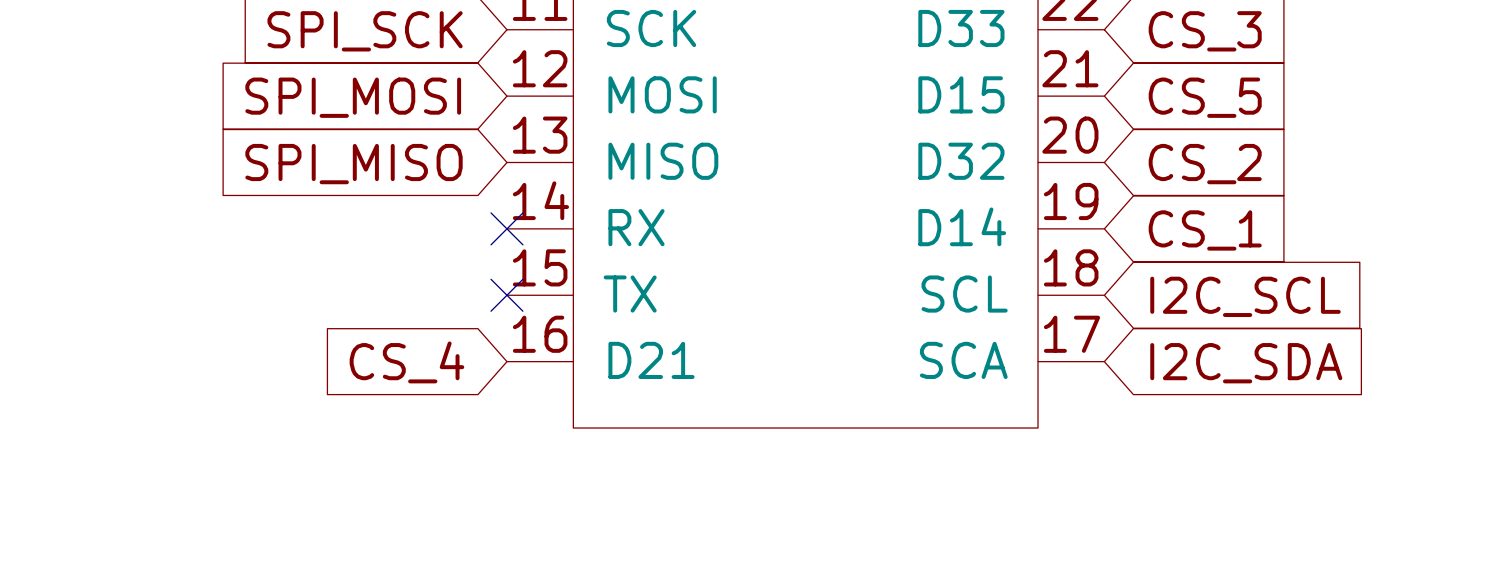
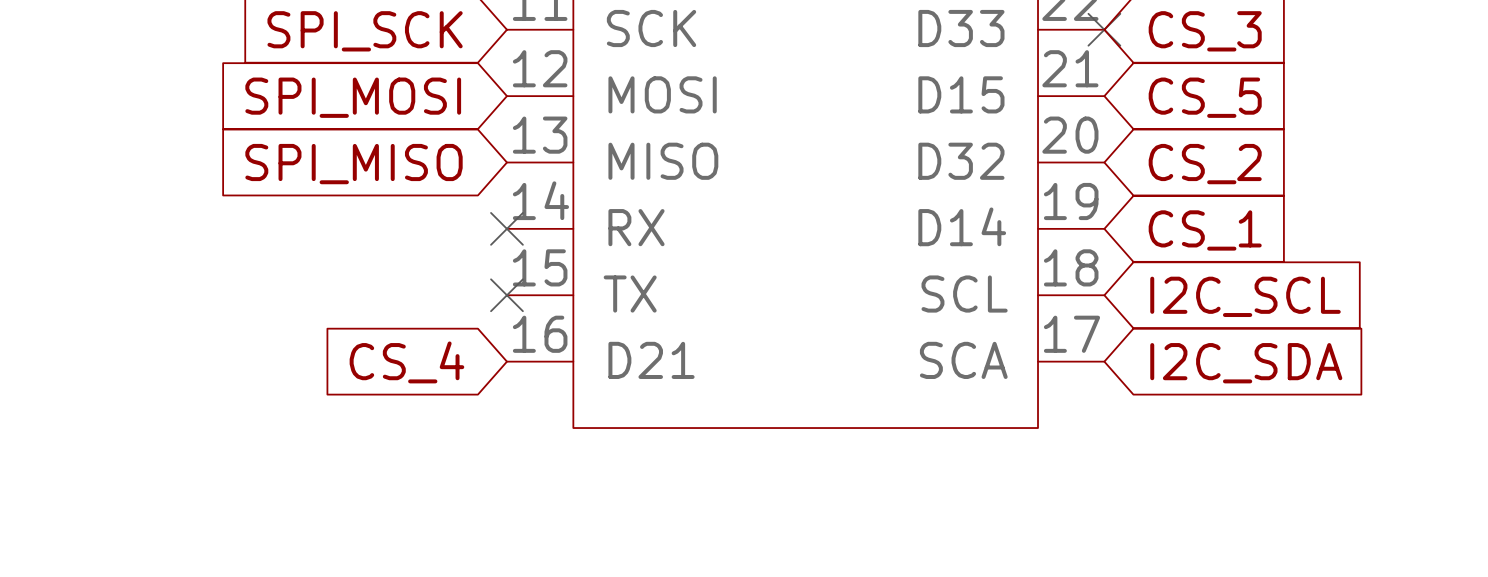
no-connect mark: none -> (1104, 29)

